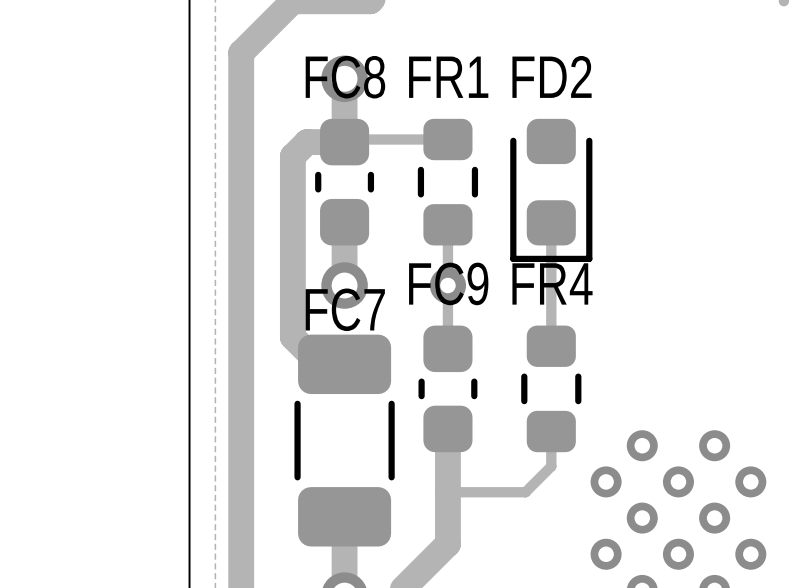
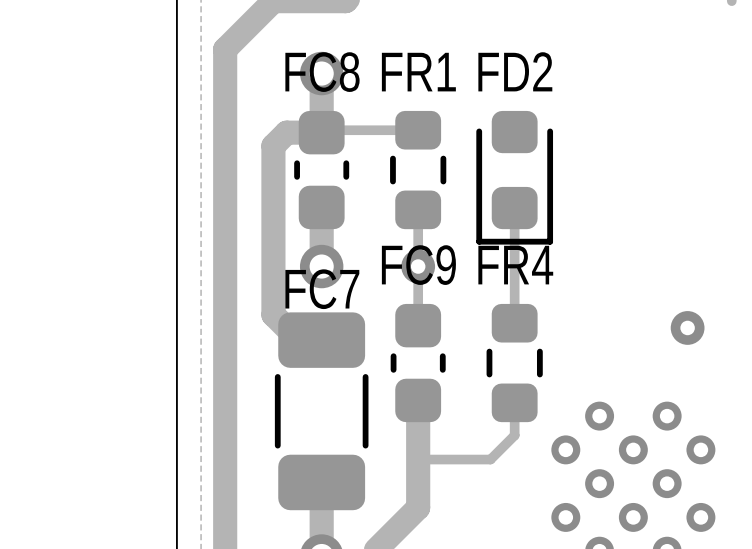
via: none -> (687, 327)

